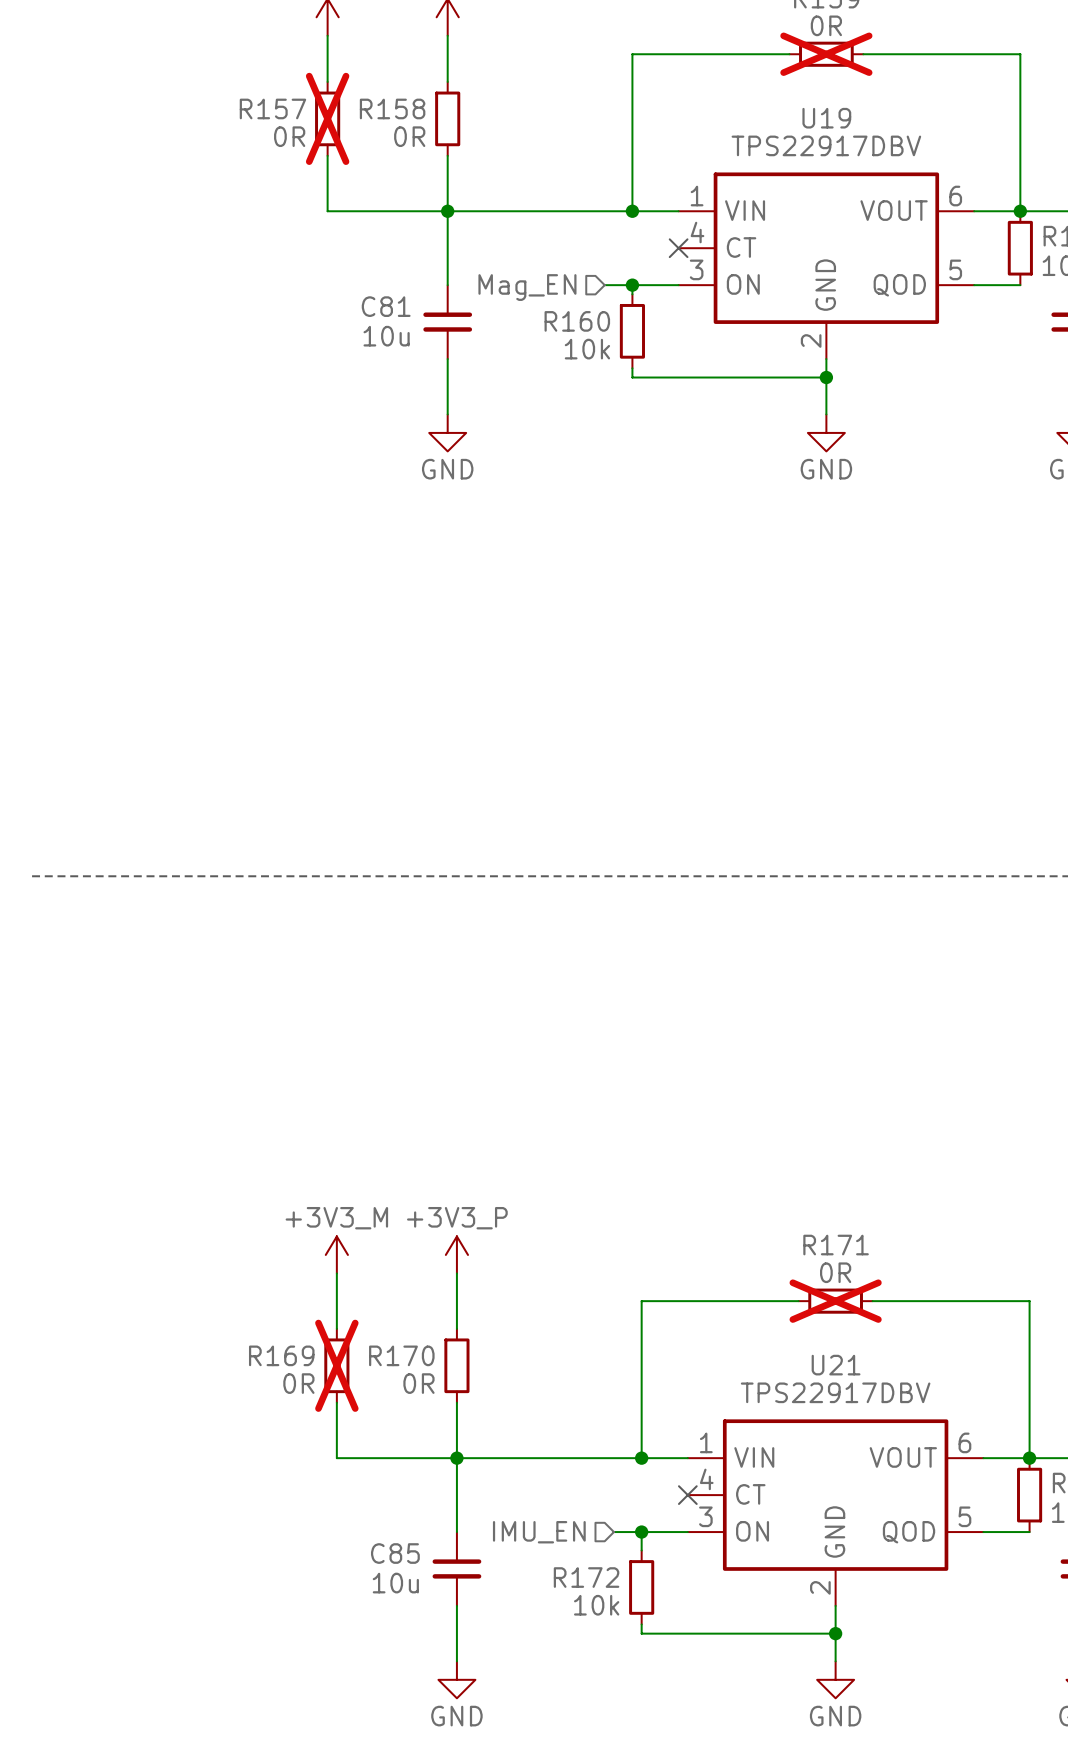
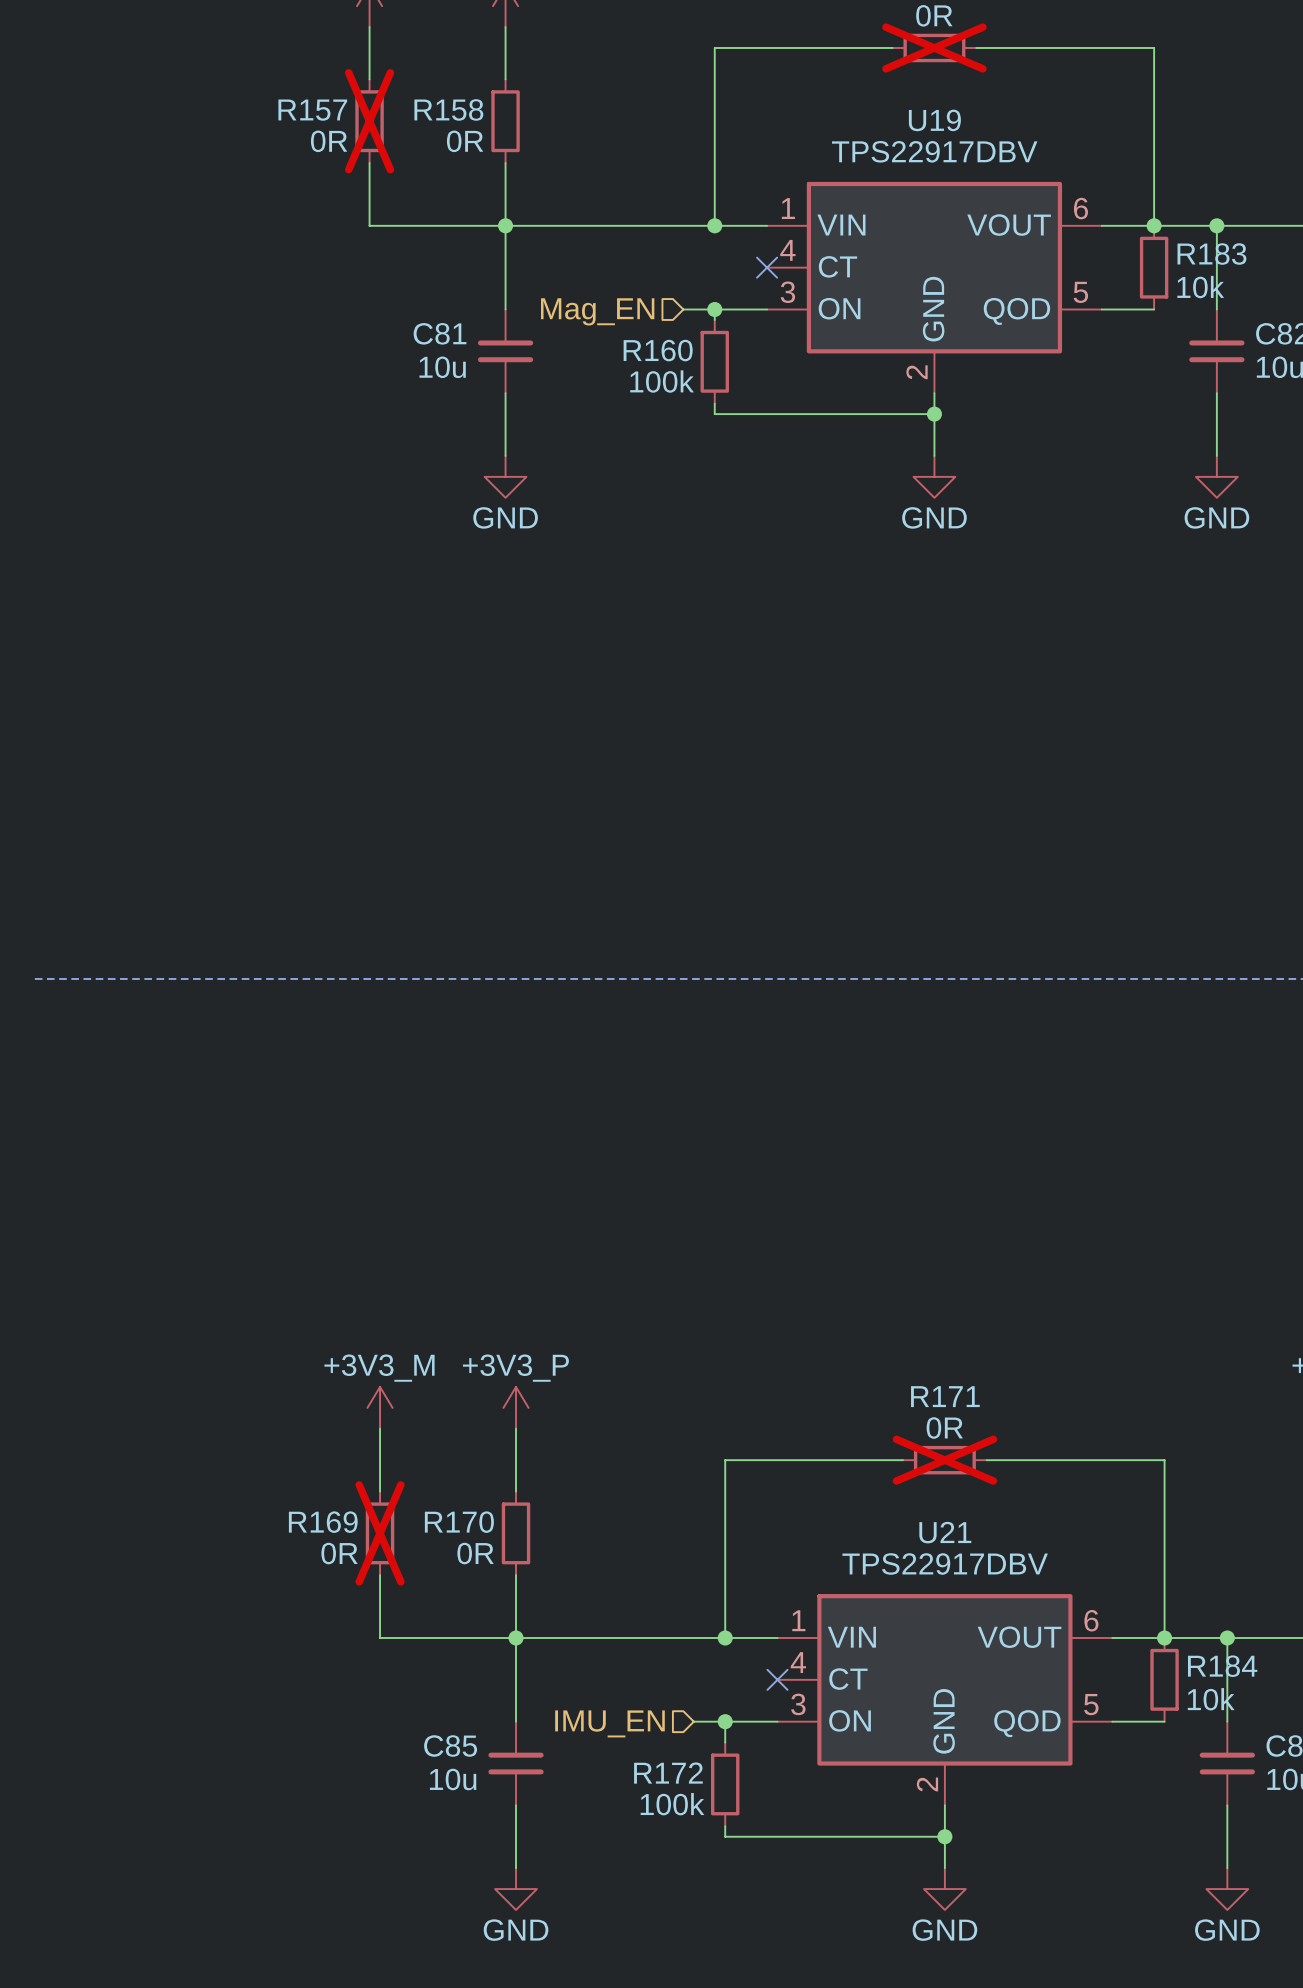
R160 value: 10k (587, 349) -> 100k (662, 381)
R172 value: 10k (596, 1605) -> 100k (672, 1804)

